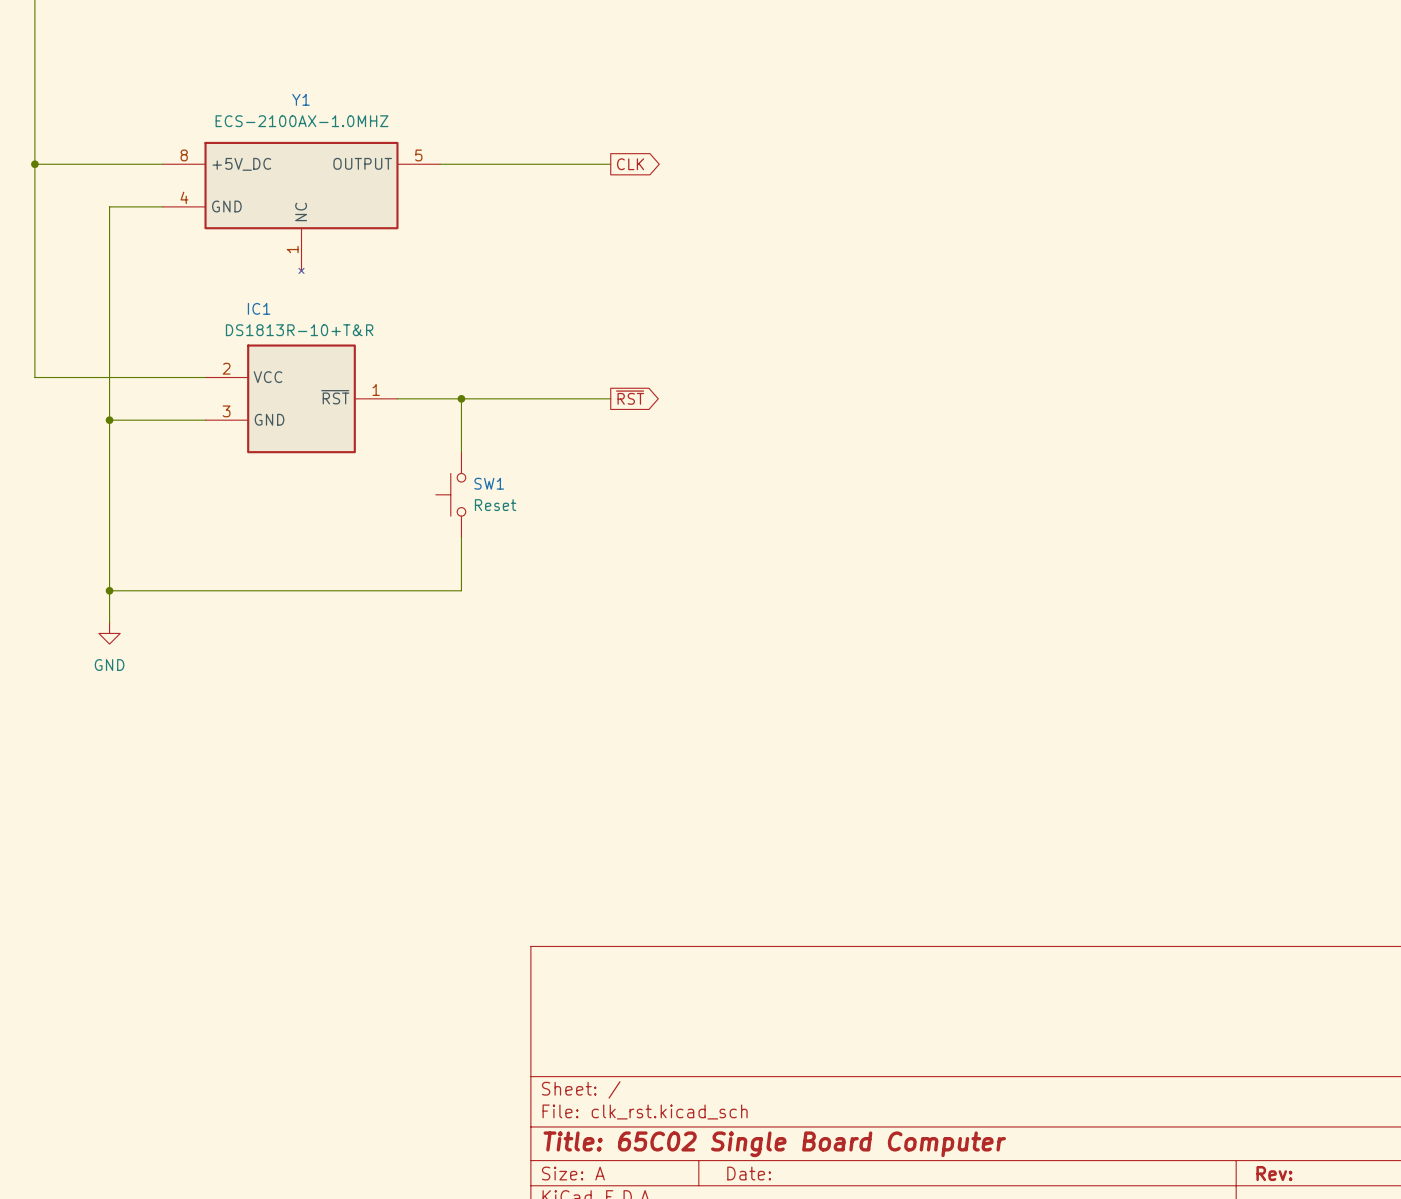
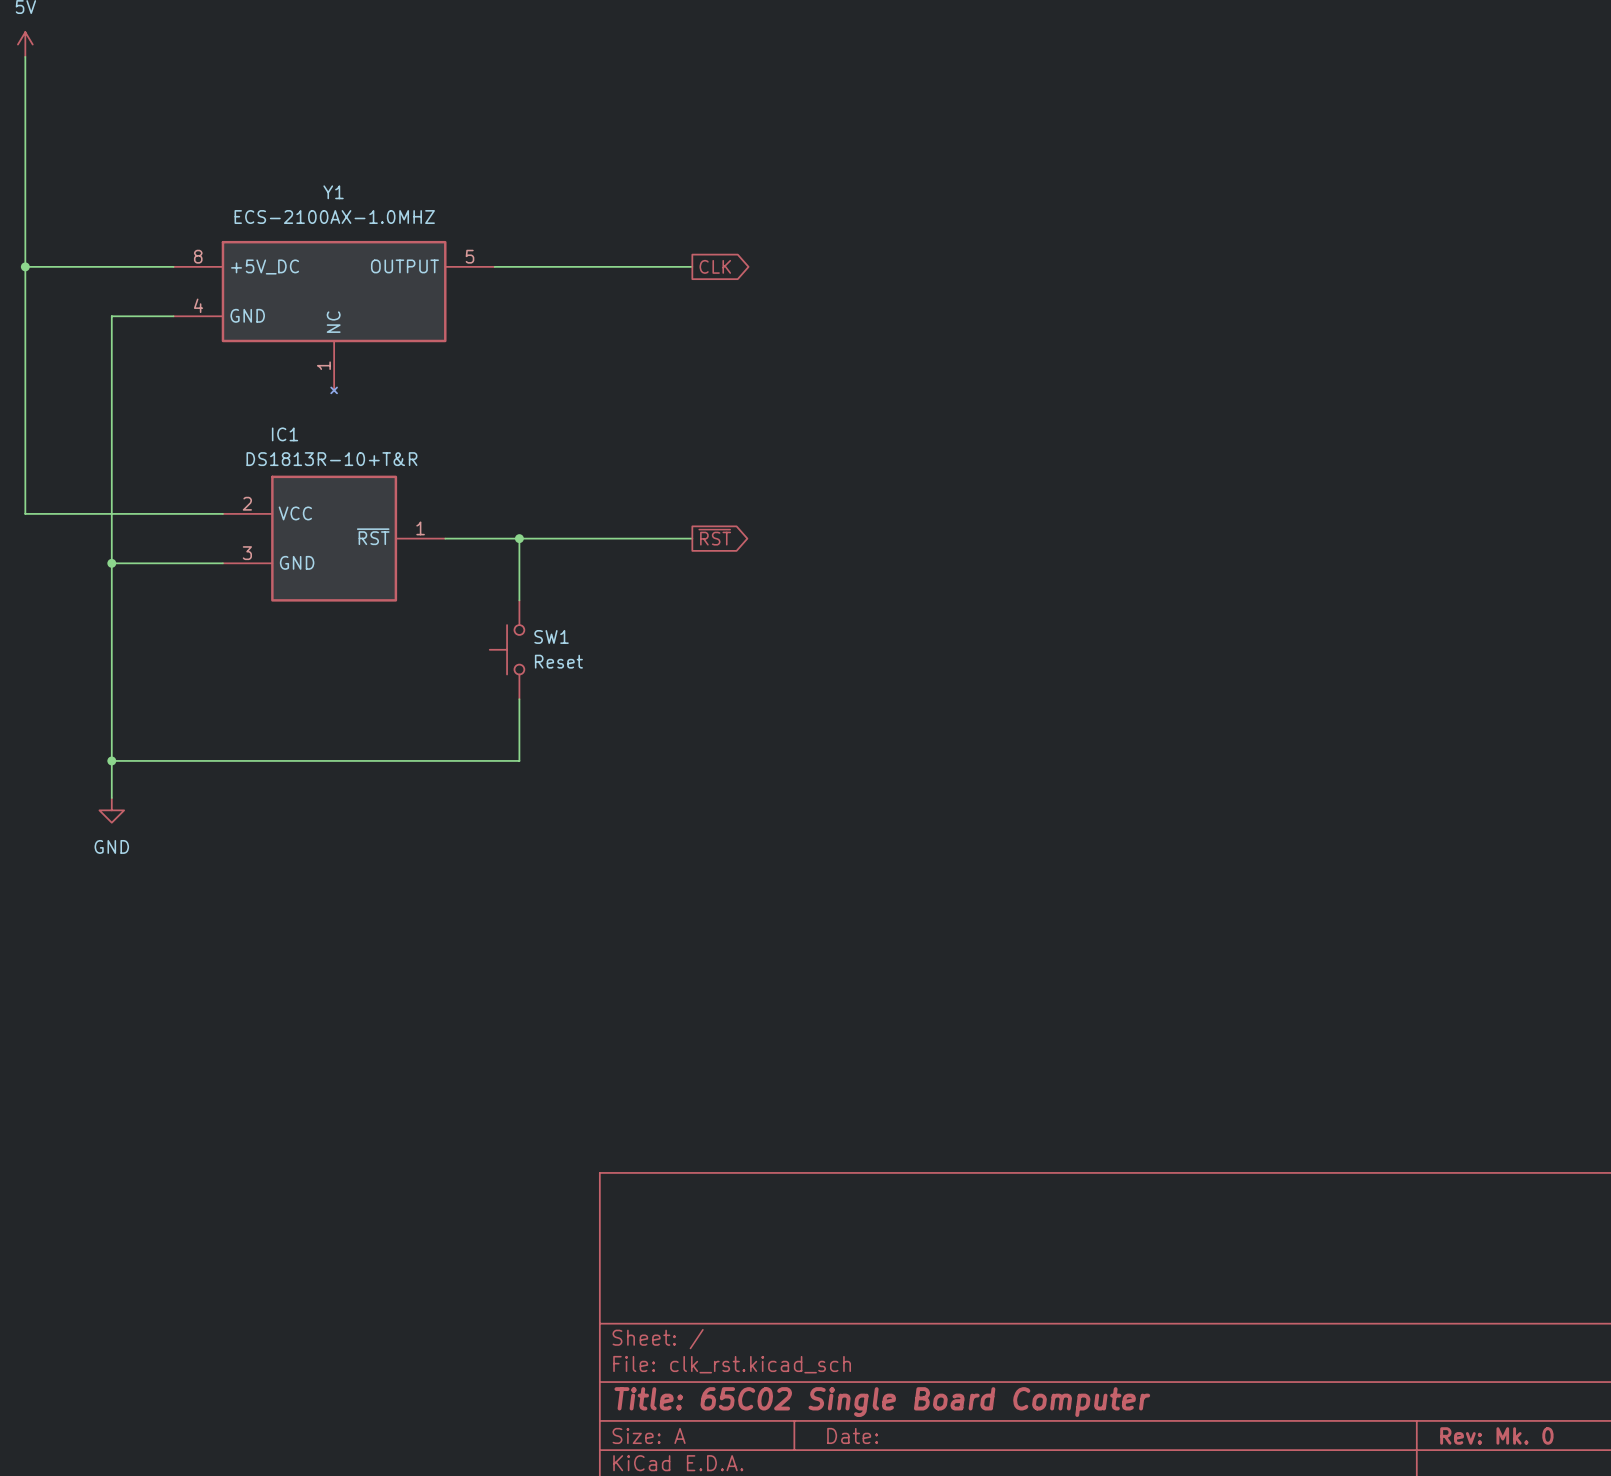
title block: Rev: (1274, 1173) -> Rev: Mk. 0 (1496, 1435)

